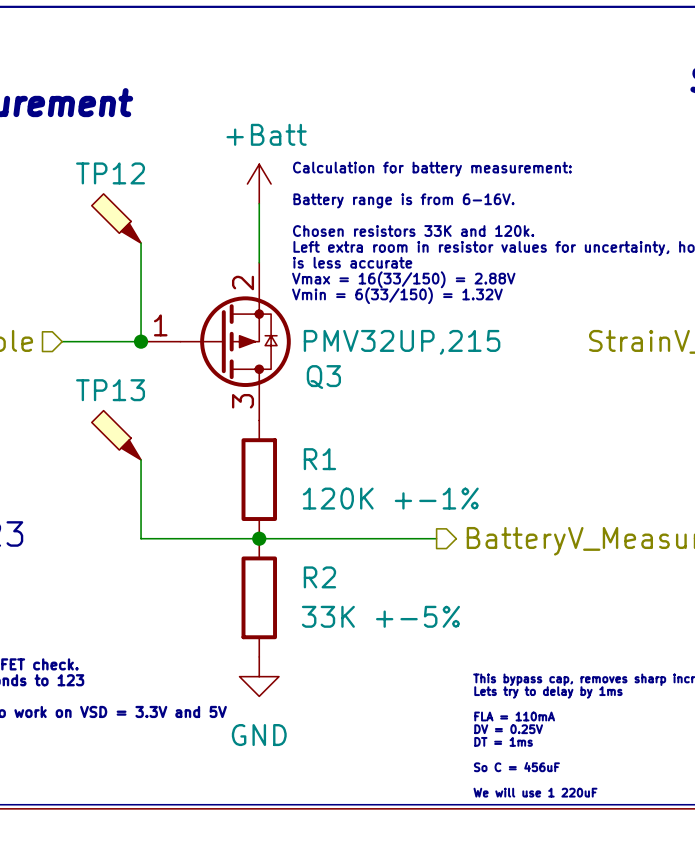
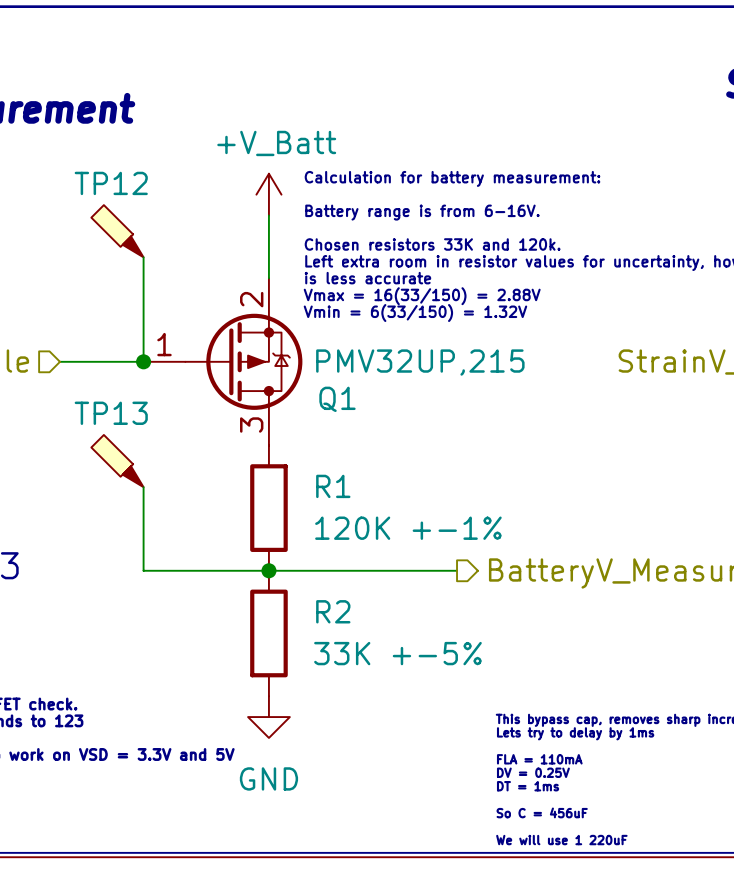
power symbol: +Batt (259, 184) -> +V_Batt (268, 194)
Q3: PMV32UP,215 (215, 341) -> none
Q1: none -> PMV32UP,215 (222, 361)

